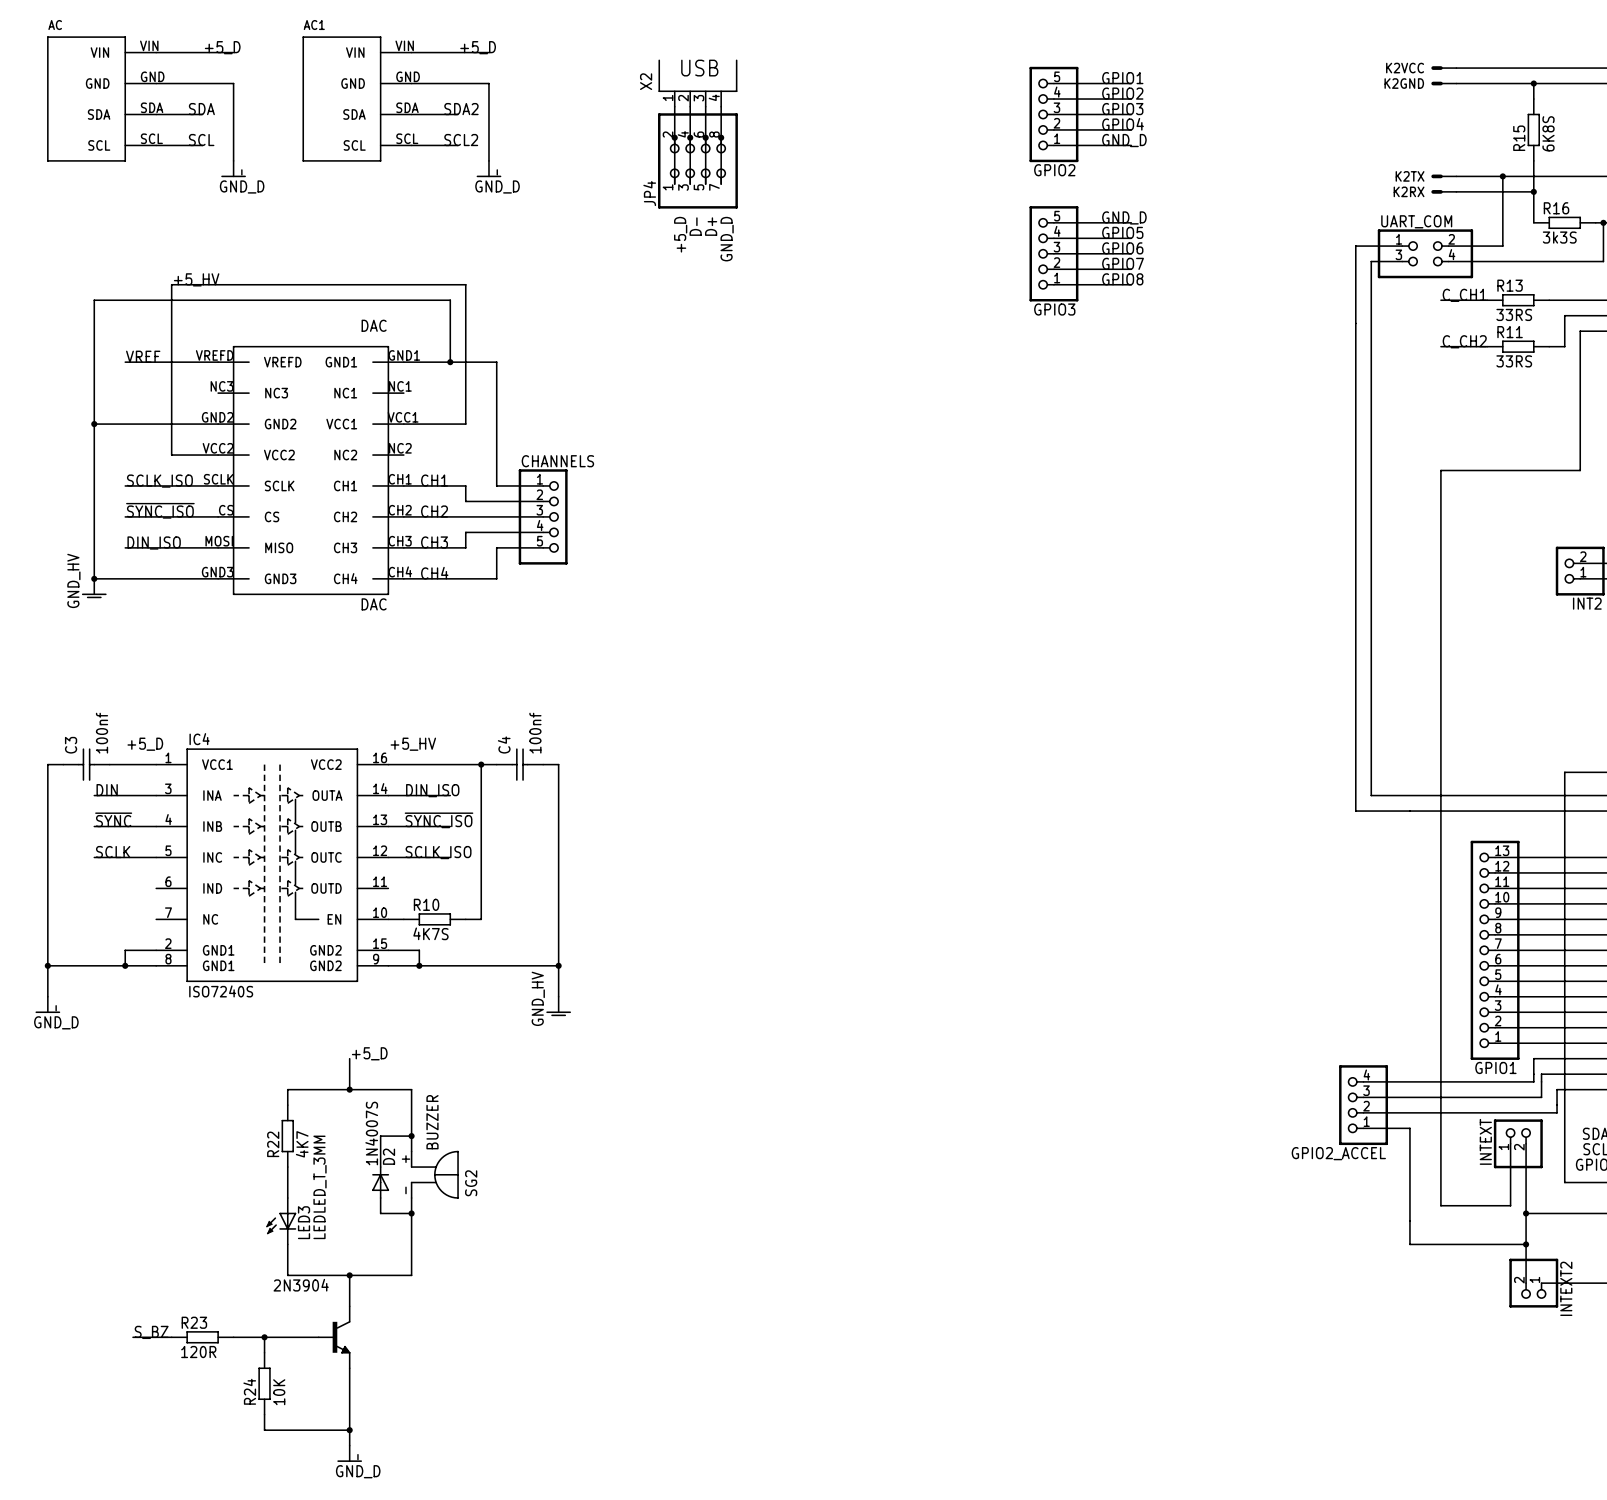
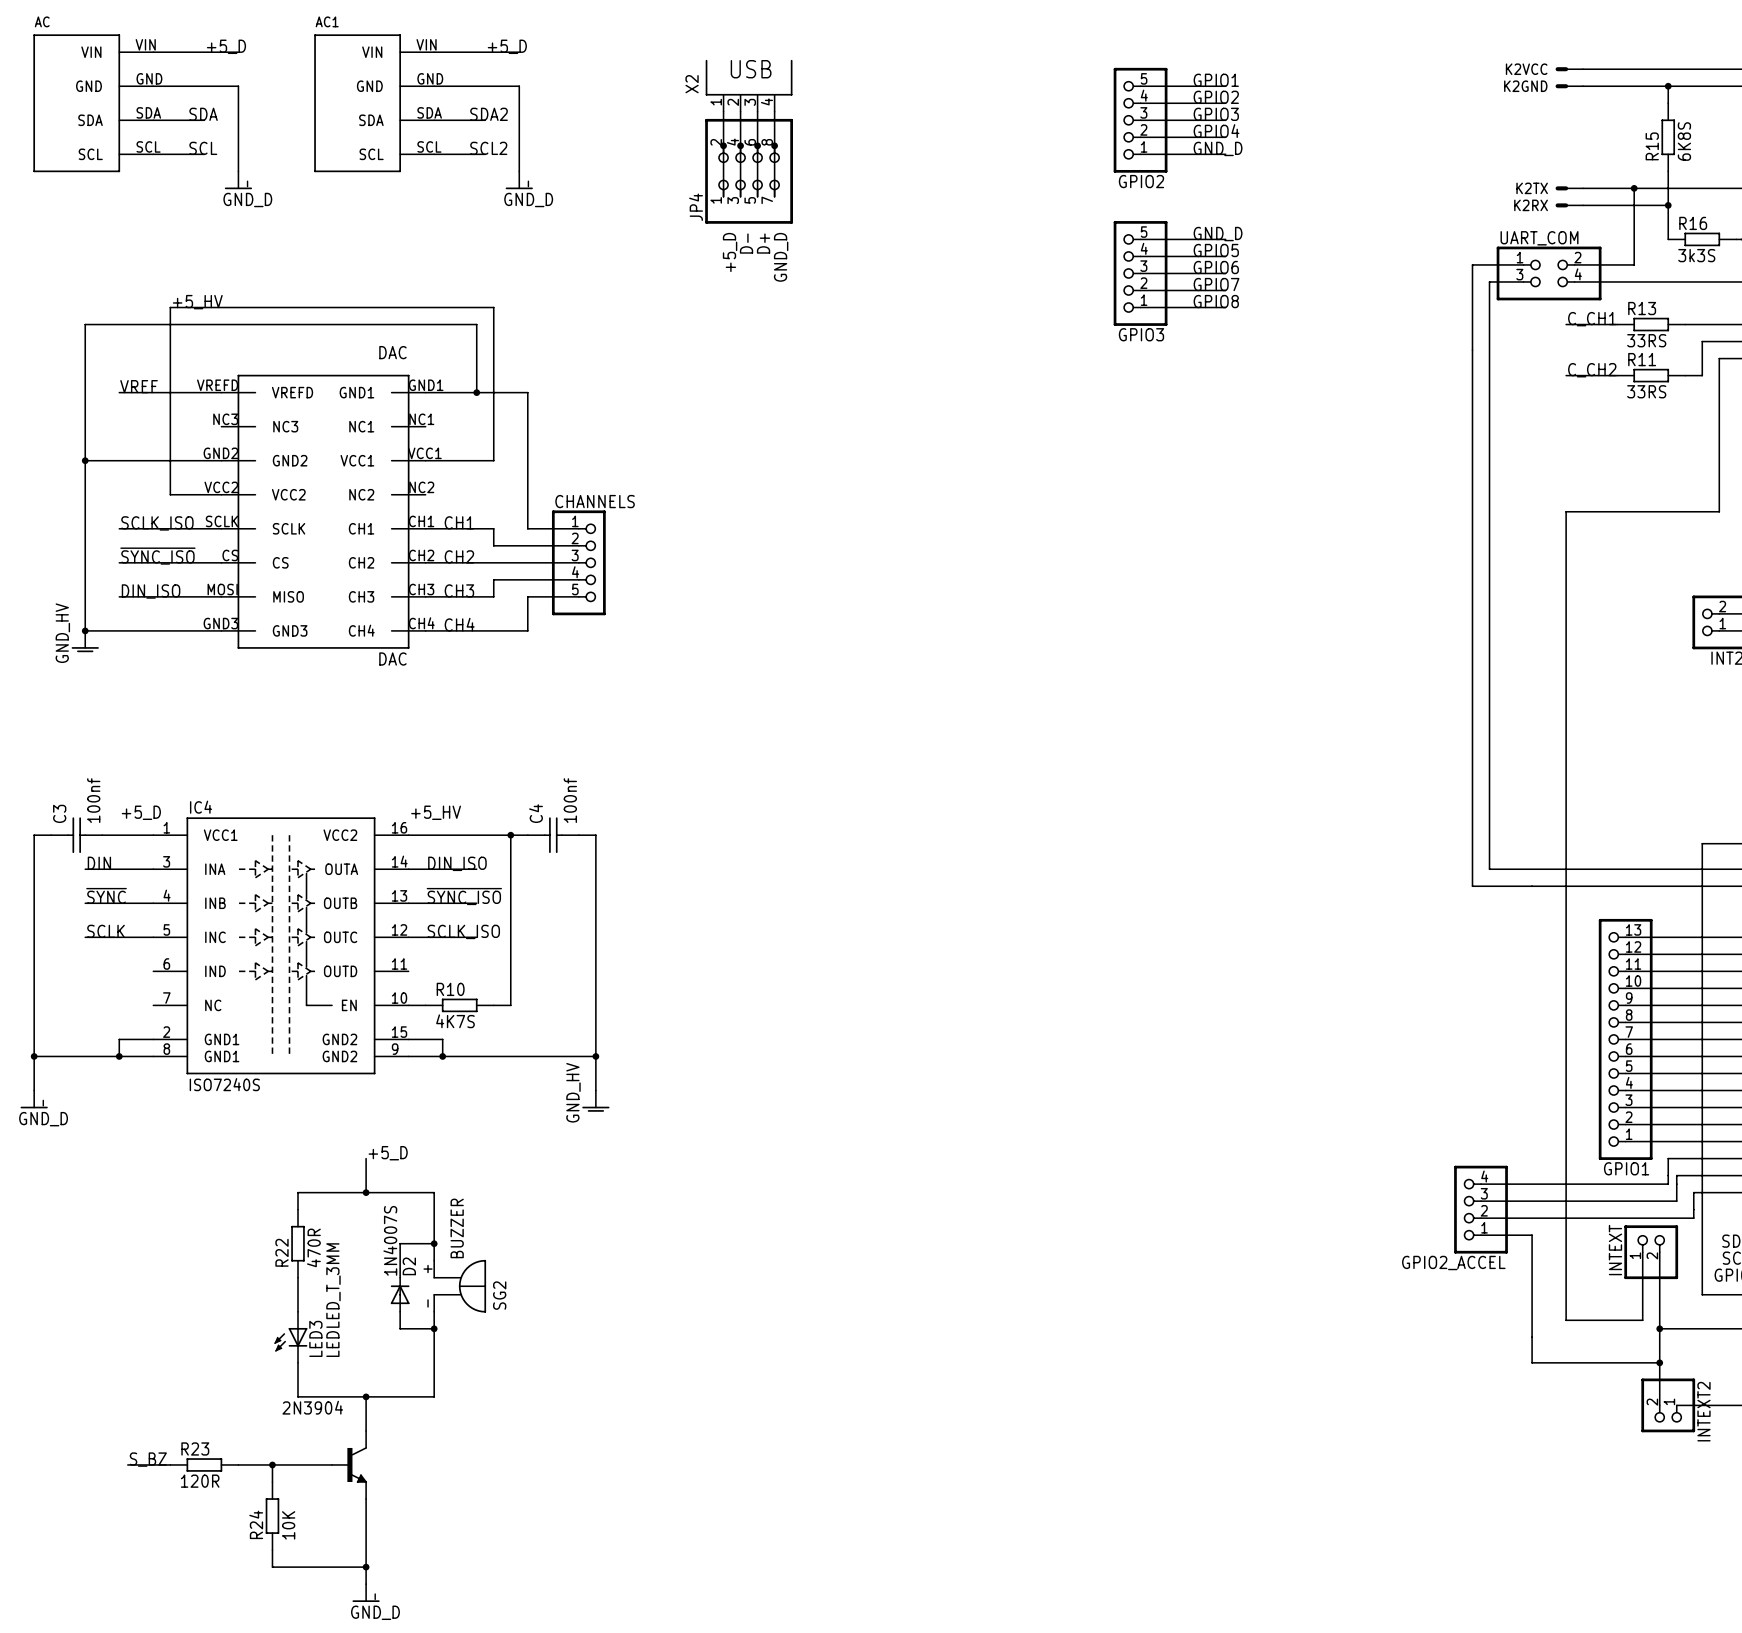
R22 value: 4K7 (302, 1144) -> 470R (313, 1247)

